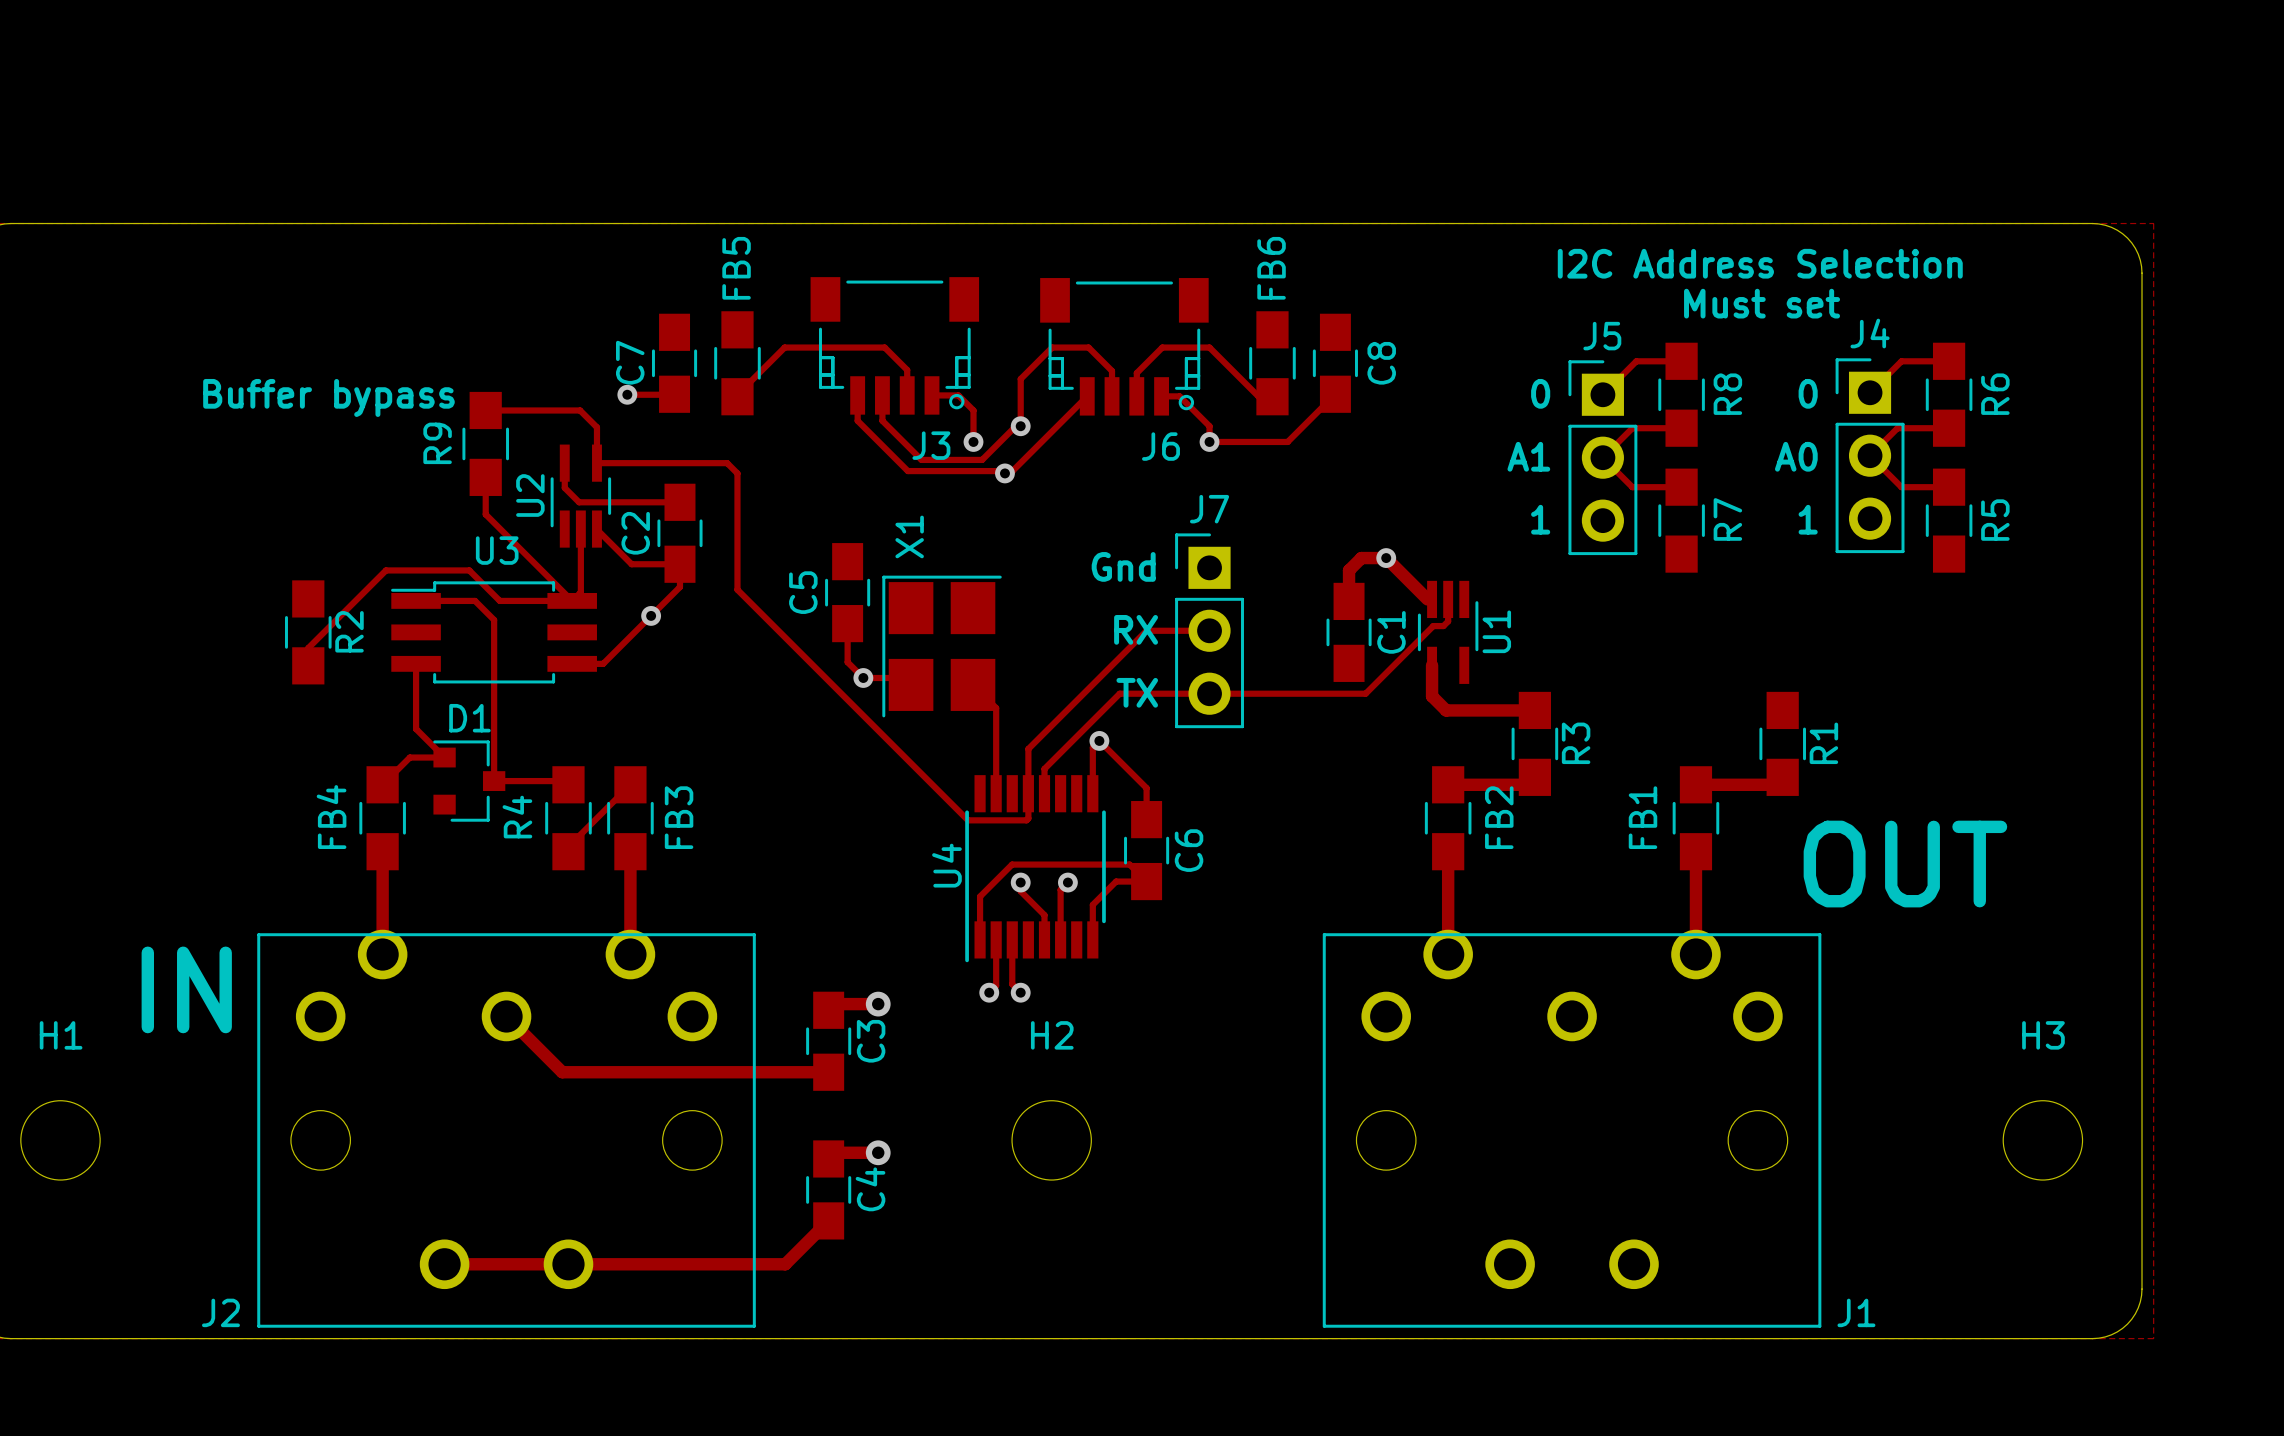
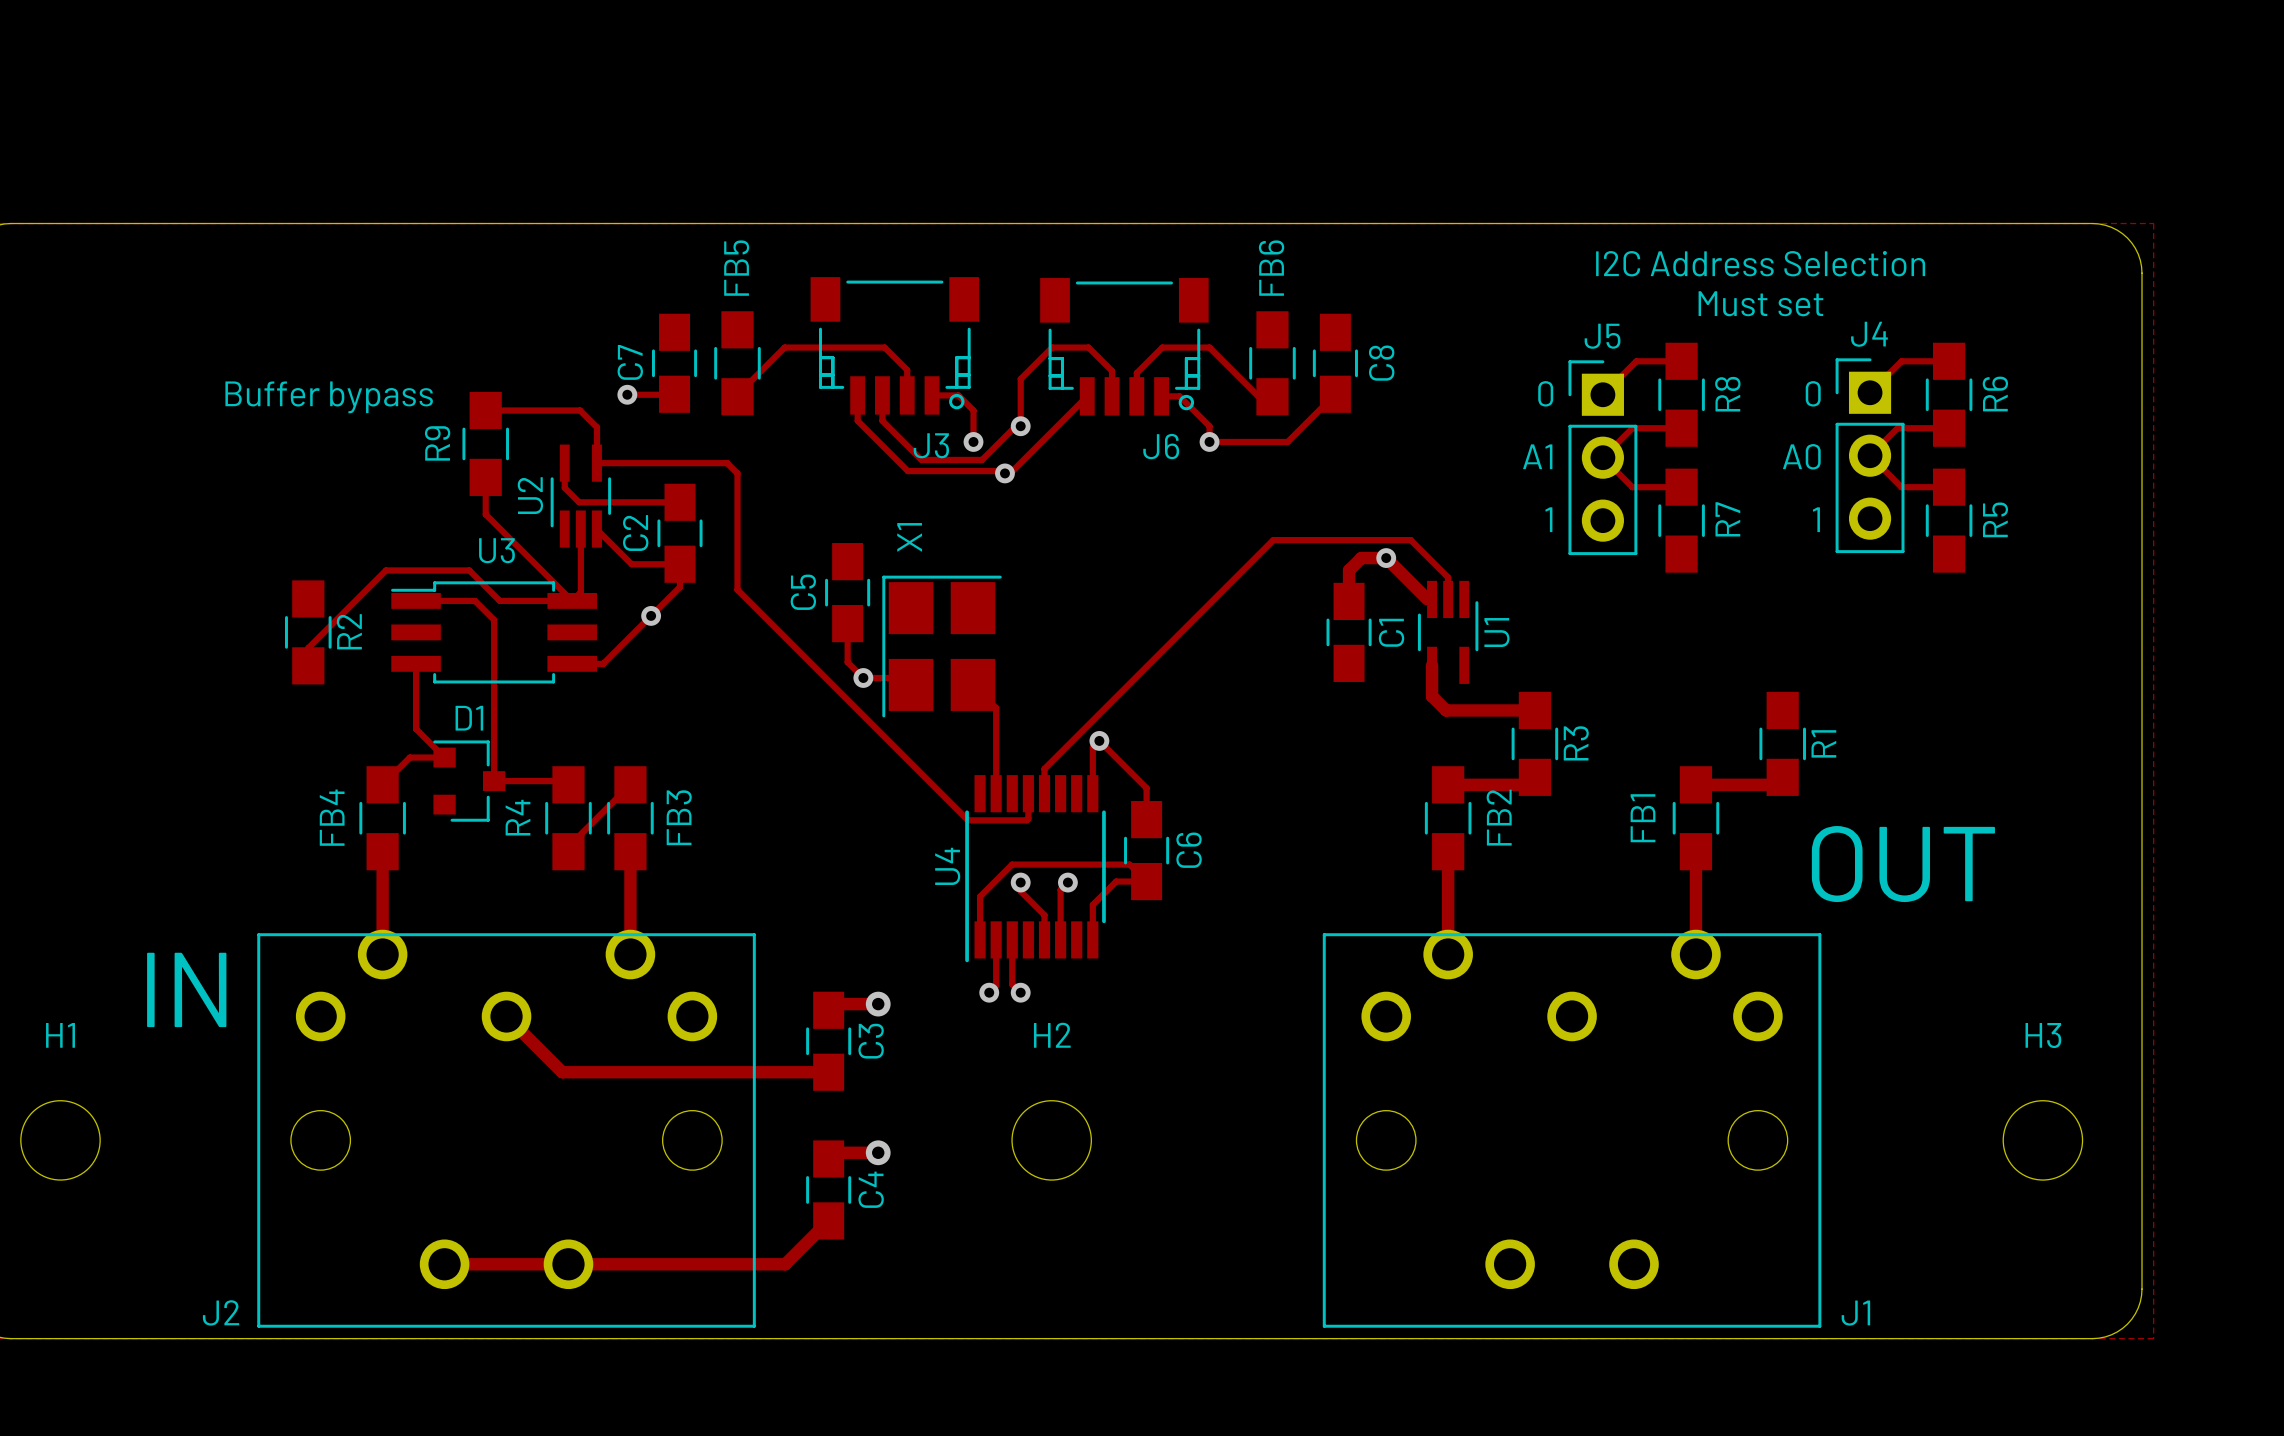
text: Gnd (1123, 566) -> none
track: (1448, 599) (1448, 621) (1443, 626) (1433, 626) (1365, 693) (1119, 693) -> (1448, 599) (1448, 577) (1410, 540) (1273, 540) (1119, 693)
text: RX (1136, 629) -> none
track: (1209, 630) (1146, 630) (1028, 748) (1028, 793) -> none
J7: (1209, 630) -> none
text: TX (1137, 692) -> none

